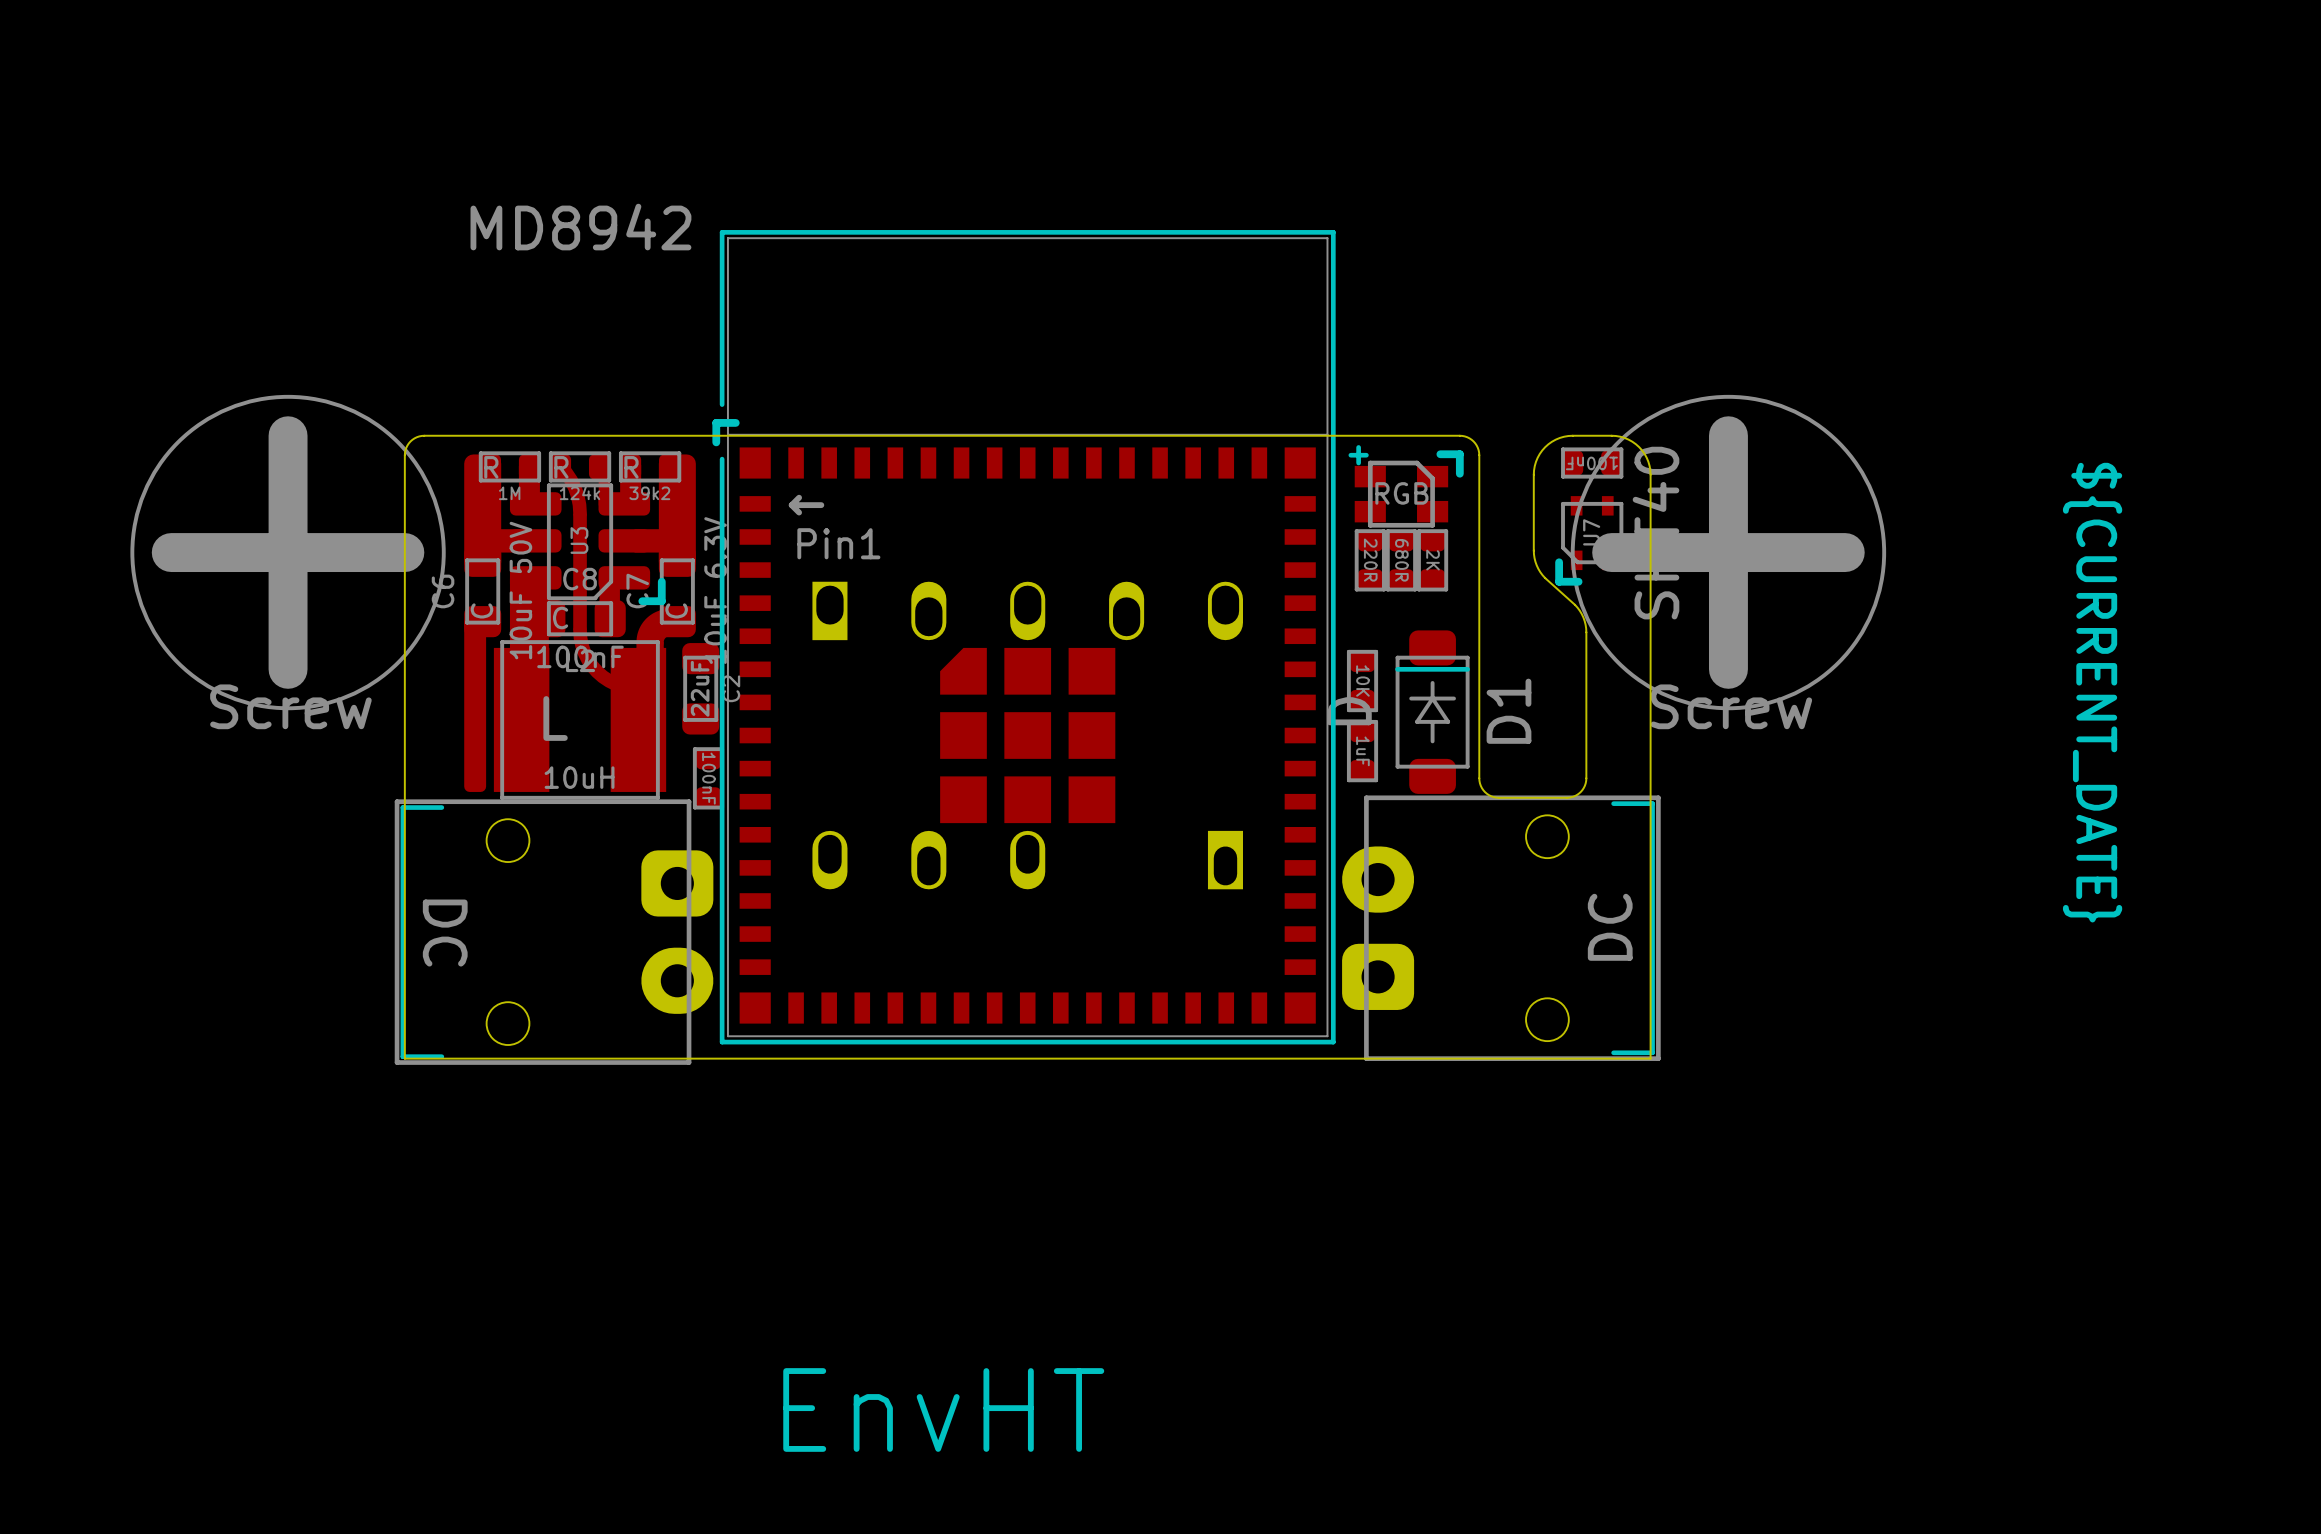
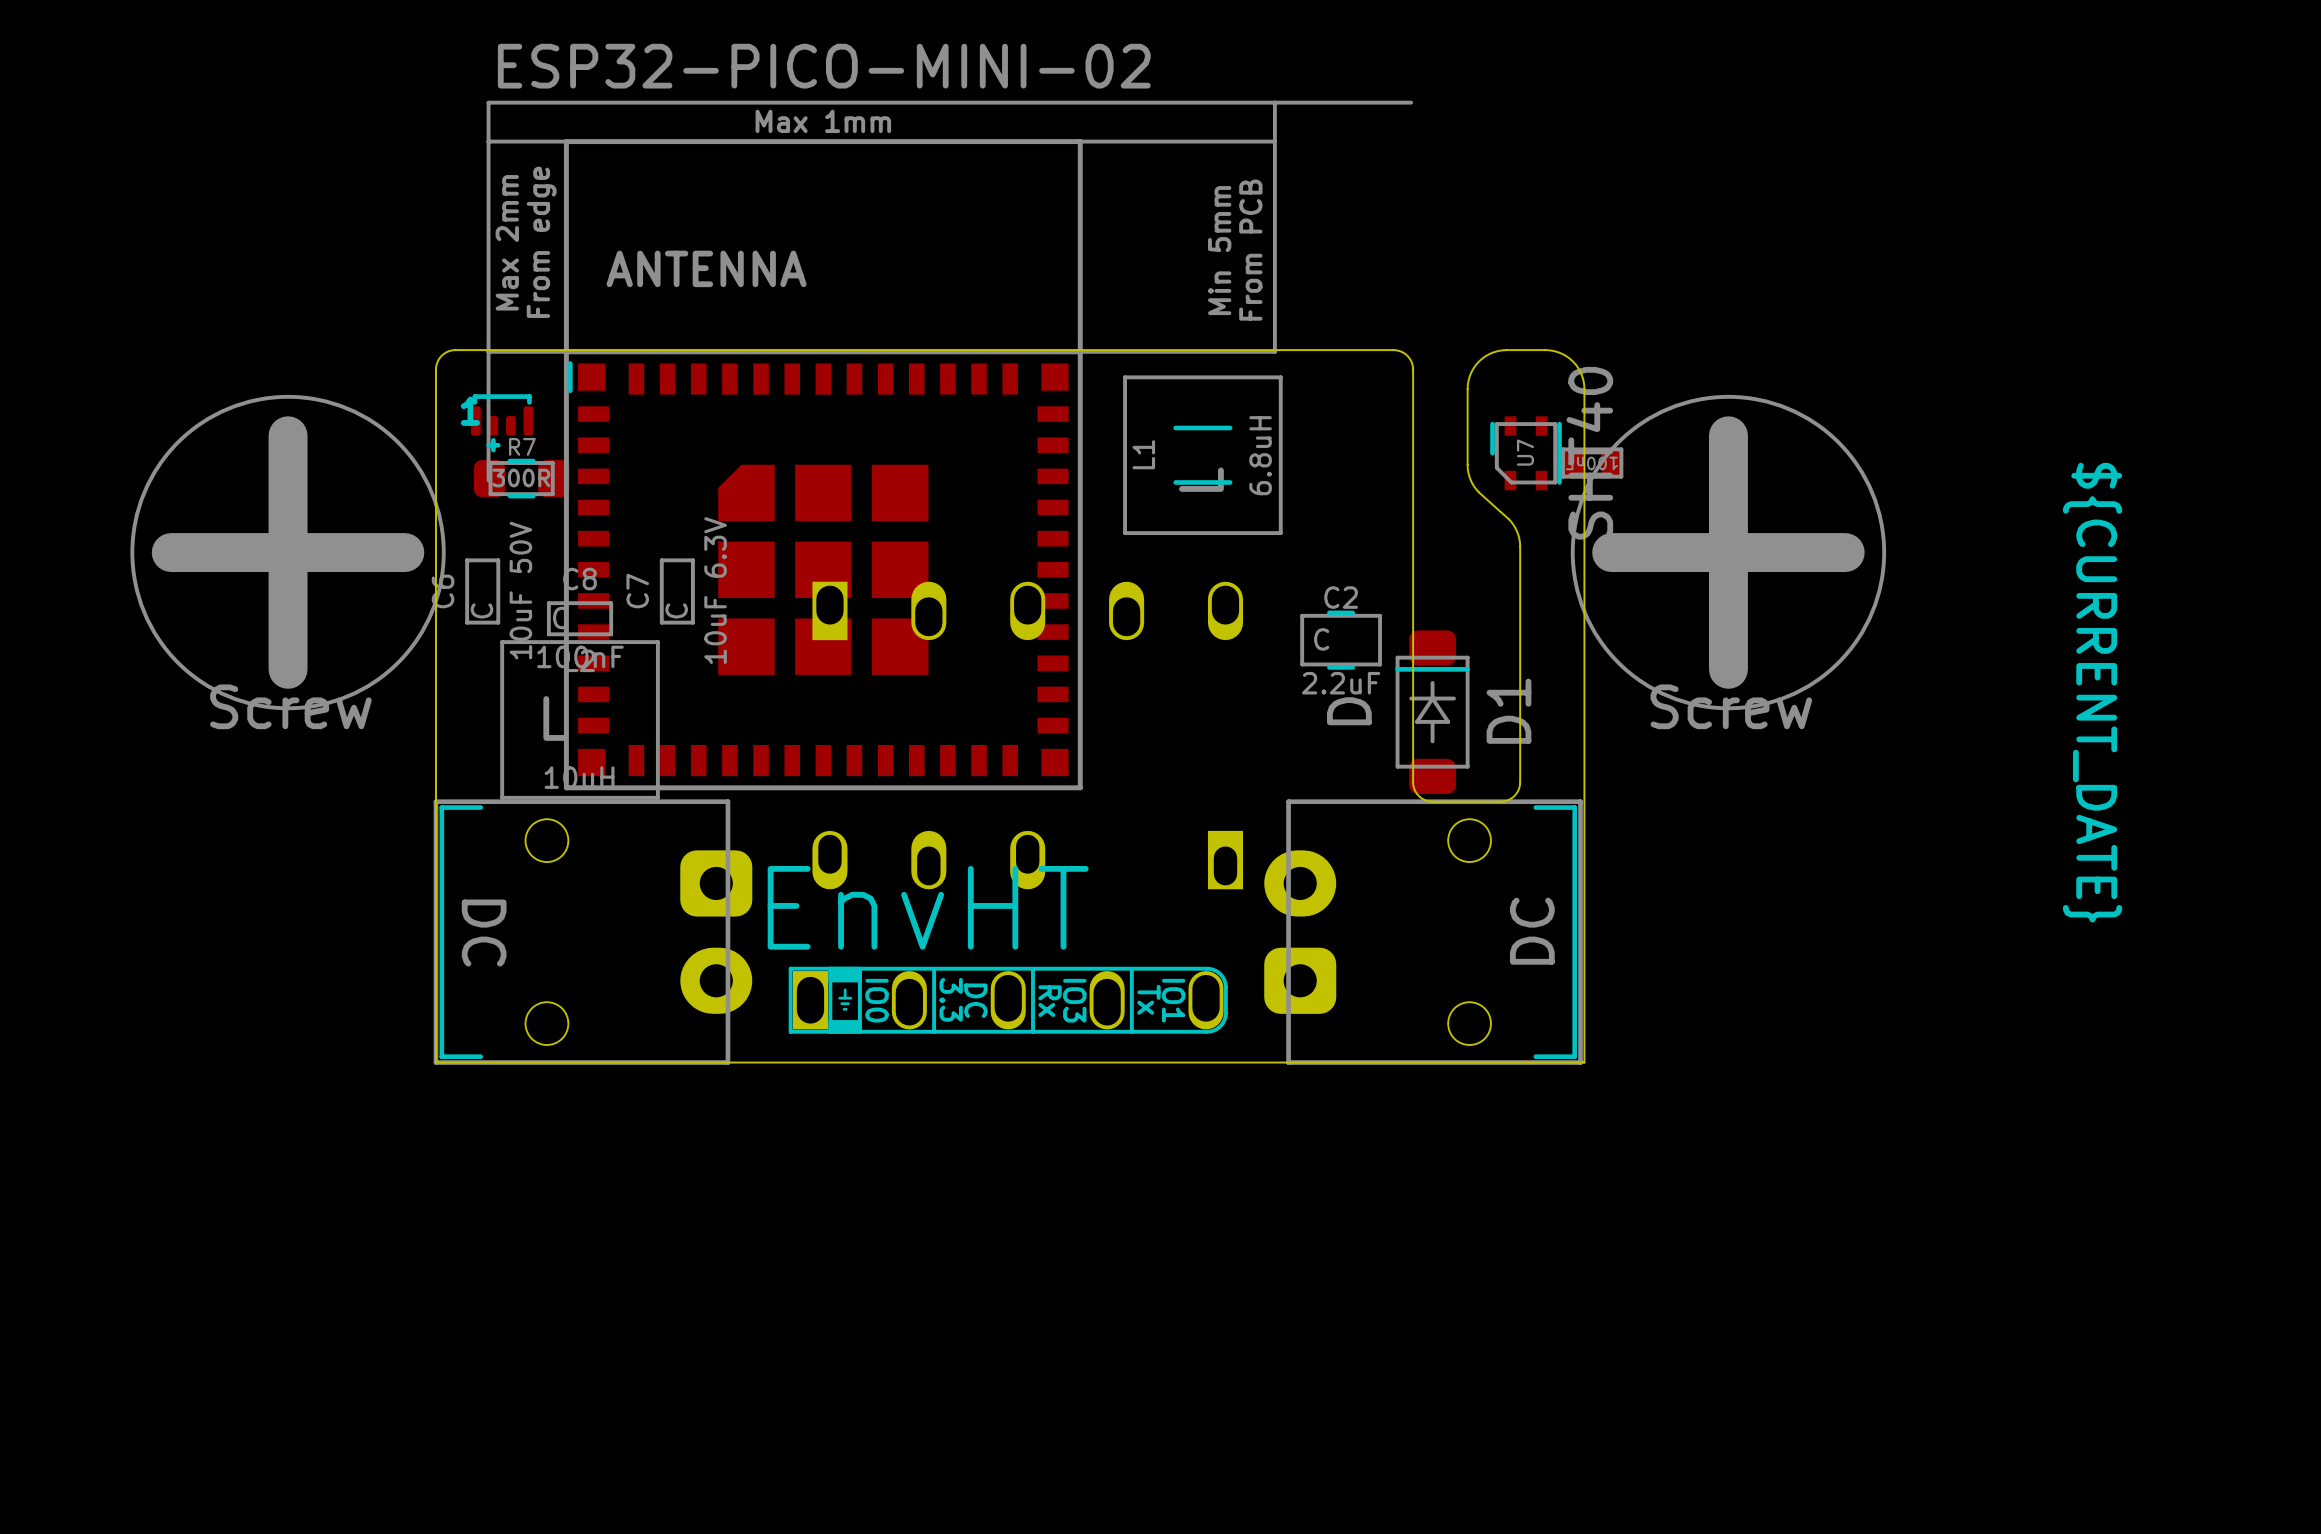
part: none -> (502, 423)
board edge: (424, 435) (1464, 436) (1475, 443) (1479, 455) (1479, 780) (1485, 792) (1498, 797) (1569, 797) (1580, 792) (1586, 780) (1585, 624) (1577, 607) (1545, 578) (1535, 561) (1533, 474) (1535, 461) (1548, 444) (1564, 436) (1611, 435) (1628, 439) (1644, 453) (1650, 474) (1650, 1058) (404, 1058) (404, 455) (410, 441) (424, 435) -> (455, 350) (441, 355) (435, 369) (435, 1062) (1584, 1062) (1584, 389) (1578, 368) (1566, 356) (1549, 350) (1497, 351) (1479, 361) (1469, 376) (1467, 389) (1469, 476) (1479, 492) (1511, 522) (1517, 531) (1519, 542) (1520, 784) (1514, 796) (1503, 801) (1432, 801) (1418, 796) (1413, 784) (1413, 369) (1409, 357) (1401, 351) (455, 350)
part: none -> ESP32-PICO-MINI-02 (949, 445)
drawing: [478, 451, 682, 483] -> none
L1: none -> 6.8uH (1202, 455)
R7: none -> 300R (521, 478)
part: RGB (1406, 486) -> none
U7 footprint: [1555, 496, 1624, 586] -> [1490, 416, 1562, 491]
part: 220R (1370, 560) -> none
part: 680R (1401, 560) -> none
part: 2K (1432, 560) -> none
U3: MD8942 (580, 623) -> none
part: (1024, 637) -> none
C2 footprint: [682, 643, 720, 735] -> [1300, 610, 1382, 670]
part: 10K (1362, 681) -> none
C2 value: 22uF (700, 688) -> 2.2uF (1341, 683)
part: 1uF (1362, 751) -> none
part: 100nF (708, 778) -> none
part position: (1501, 928) -> (1423, 932)
part position: (554, 932) -> (592, 932)
part: none -> (1008, 1000)
text position: EnvHT (943, 1409) -> EnvHT (928, 907)

